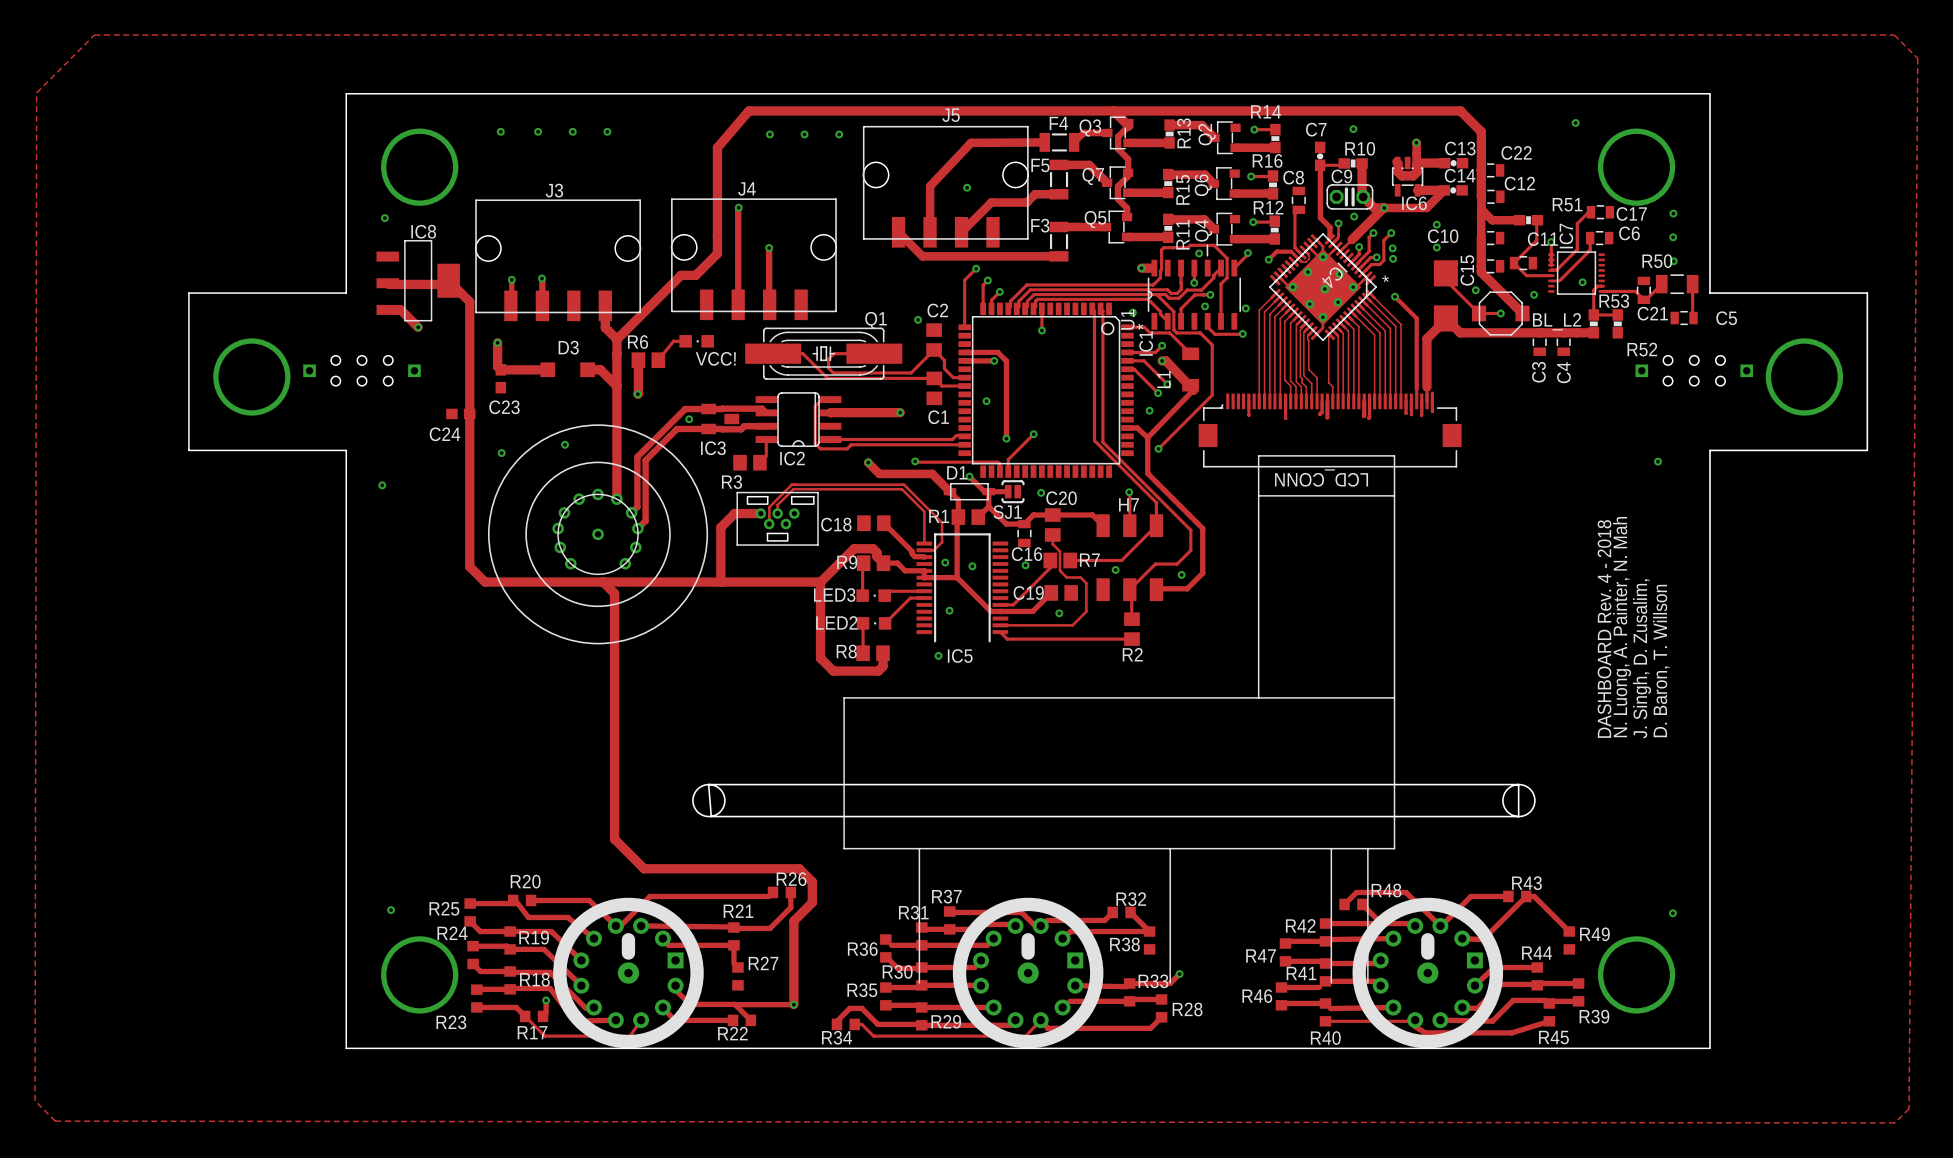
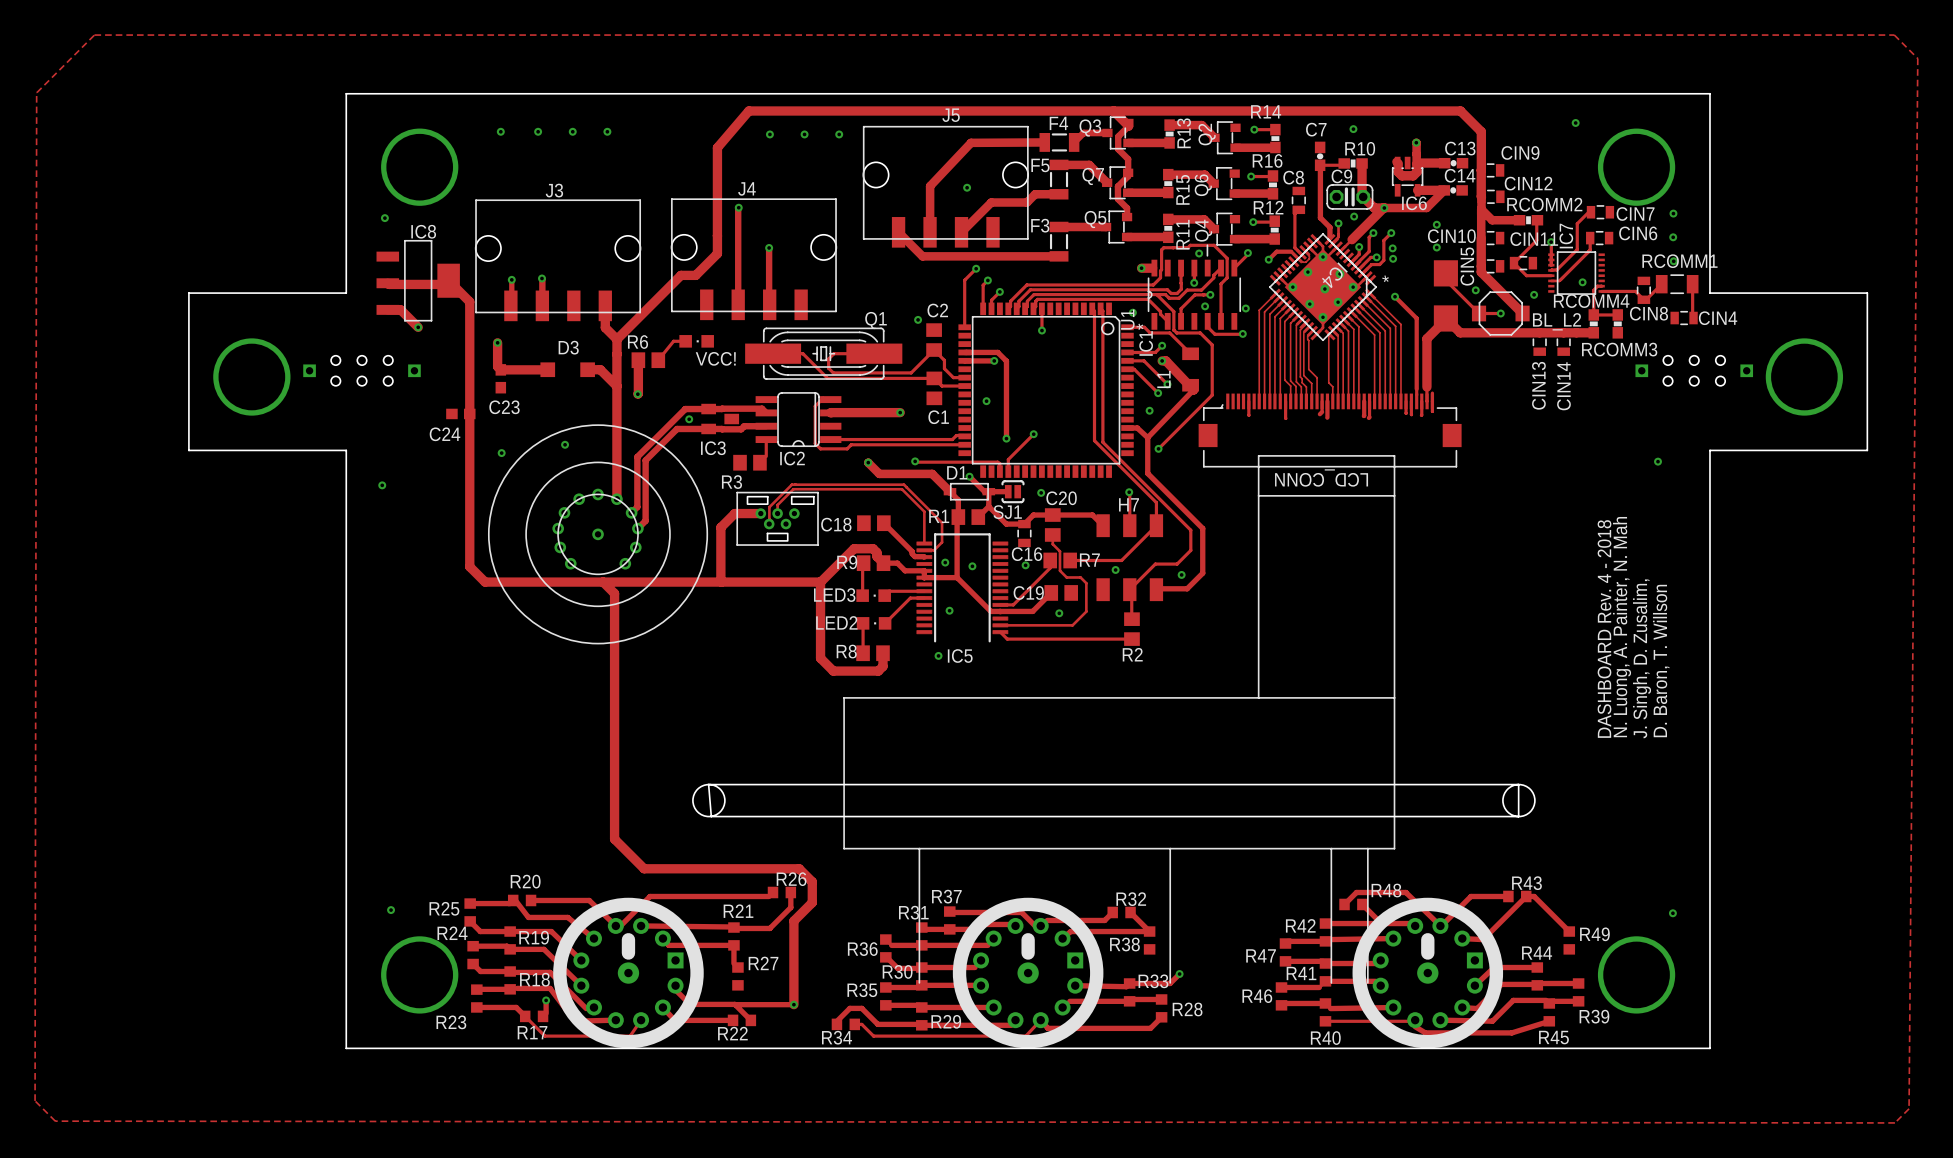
C22 name: C22 (1516, 152) -> CIN9 (1520, 152)
C12 name: C12 (1519, 183) -> CIN12 (1528, 183)
R51 name: R51 (1567, 204) -> RCOMM2 (1544, 204)
C17 name: C17 (1631, 213) -> CIN7 (1635, 213)
C6 name: C6 (1629, 233) -> CIN6 (1638, 233)
C10 name: C10 (1443, 236) -> CIN10 (1451, 236)
C11 name: C11 (1542, 239) -> CIN11 (1534, 239)
R50 name: R50 (1657, 261) -> RCOMM1 (1679, 261)
C15 name: C15 (1467, 270) -> CIN5 (1467, 266)
R53 name: R53 (1614, 301) -> RCOMM4 (1591, 301)
C21 name: C21 (1652, 313) -> CIN8 (1648, 313)
C5 name: C5 (1726, 318) -> CIN4 (1718, 318)
R52 name: R52 (1642, 349) -> RCOMM3 (1619, 349)
C3 name: C3 (1538, 372) -> CIN13 (1538, 385)
C4 name: C4 (1563, 372) -> CIN14 (1563, 386)

